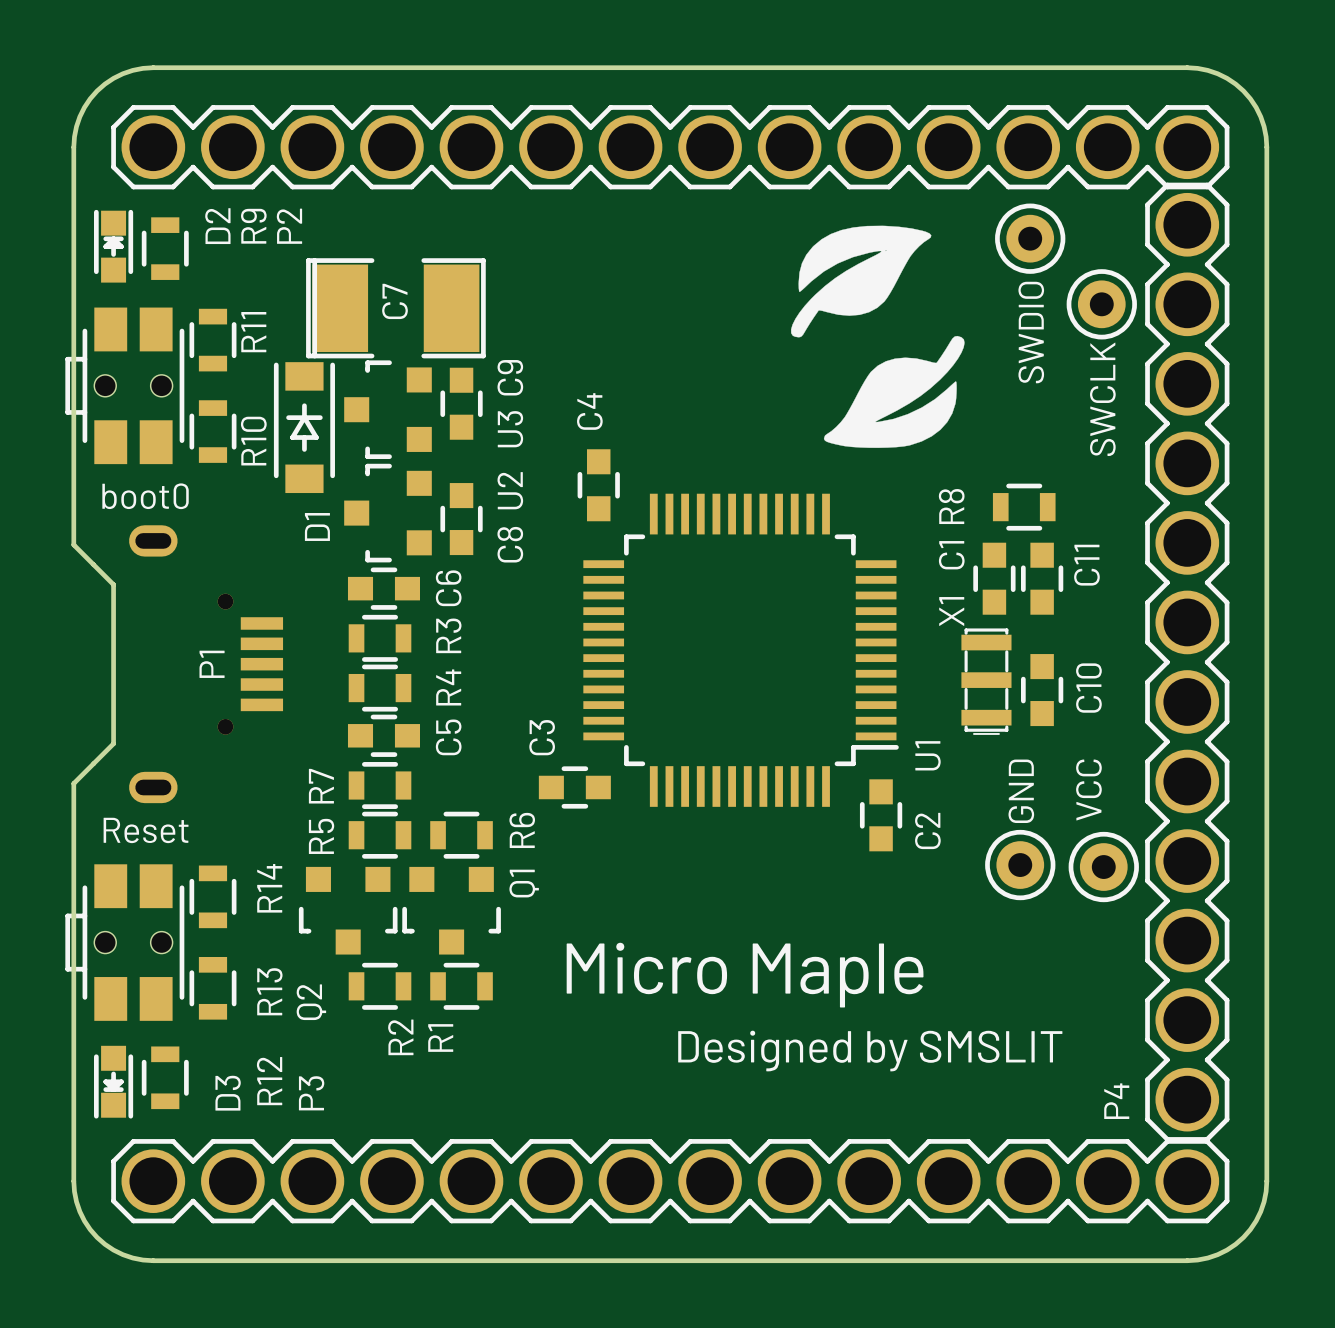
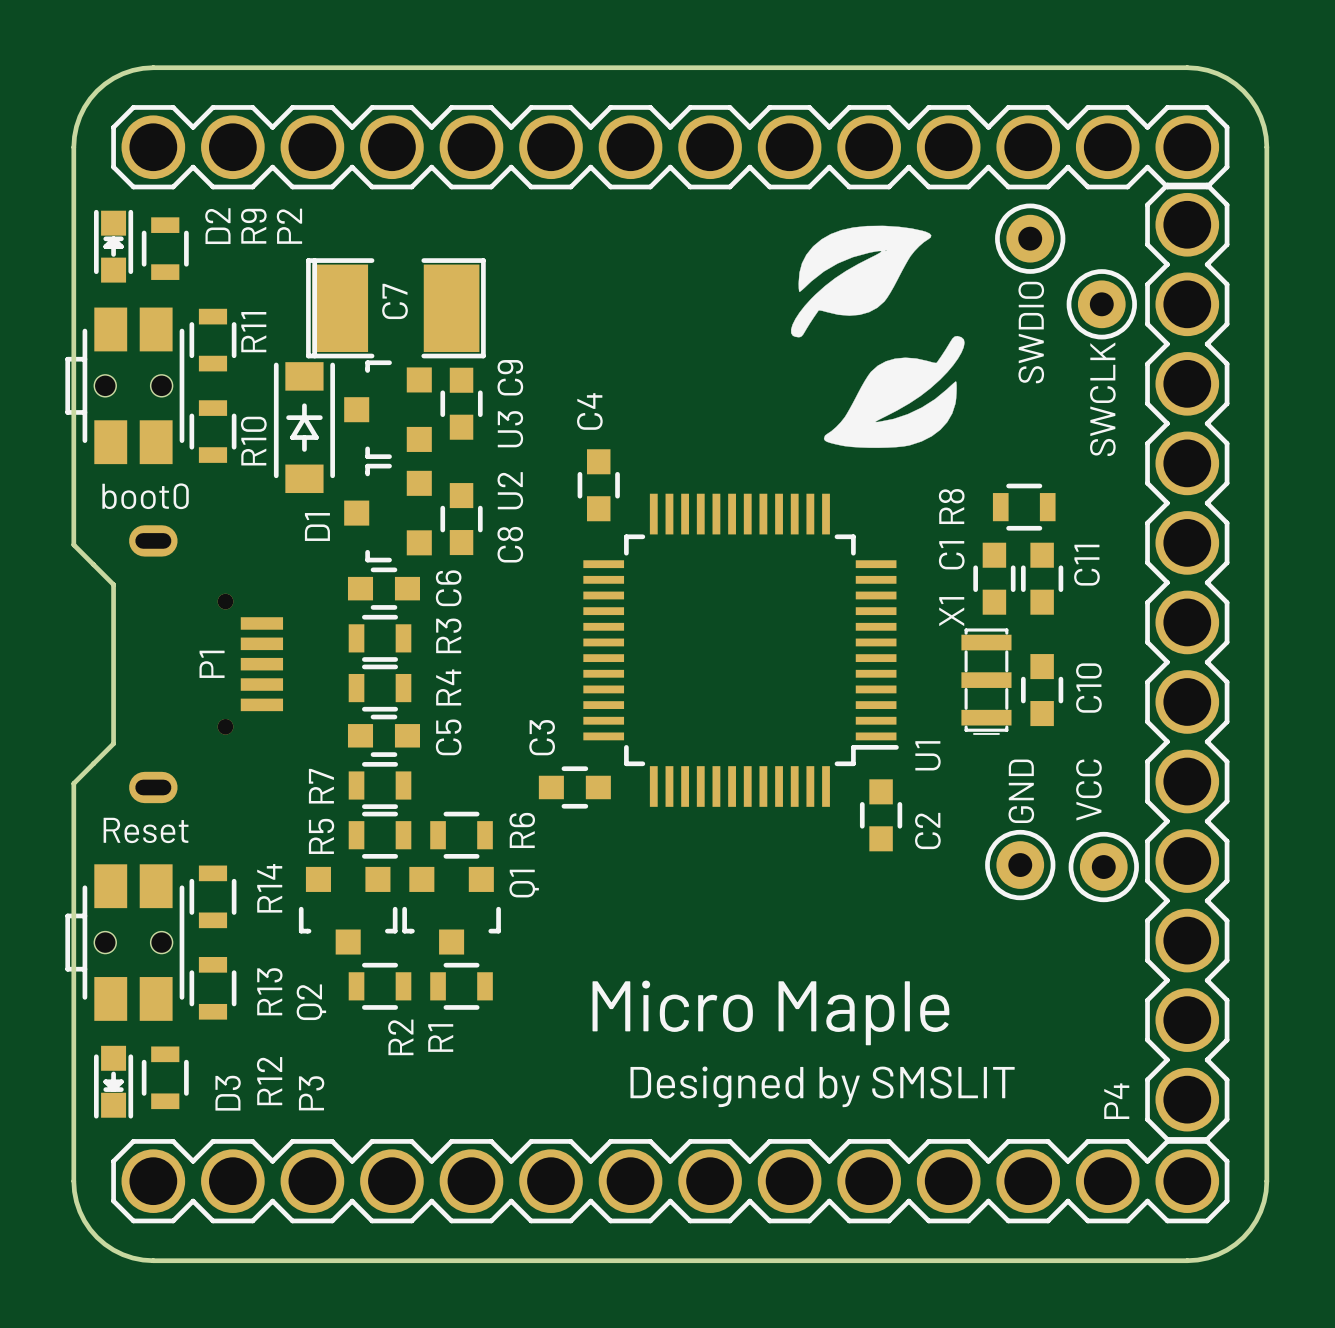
text position: Micro Maple (745, 975) -> Micro Maple (770, 1012)
text position: Designed by SMSLIT (870, 1051) -> Designed by SMSLIT (822, 1086)

